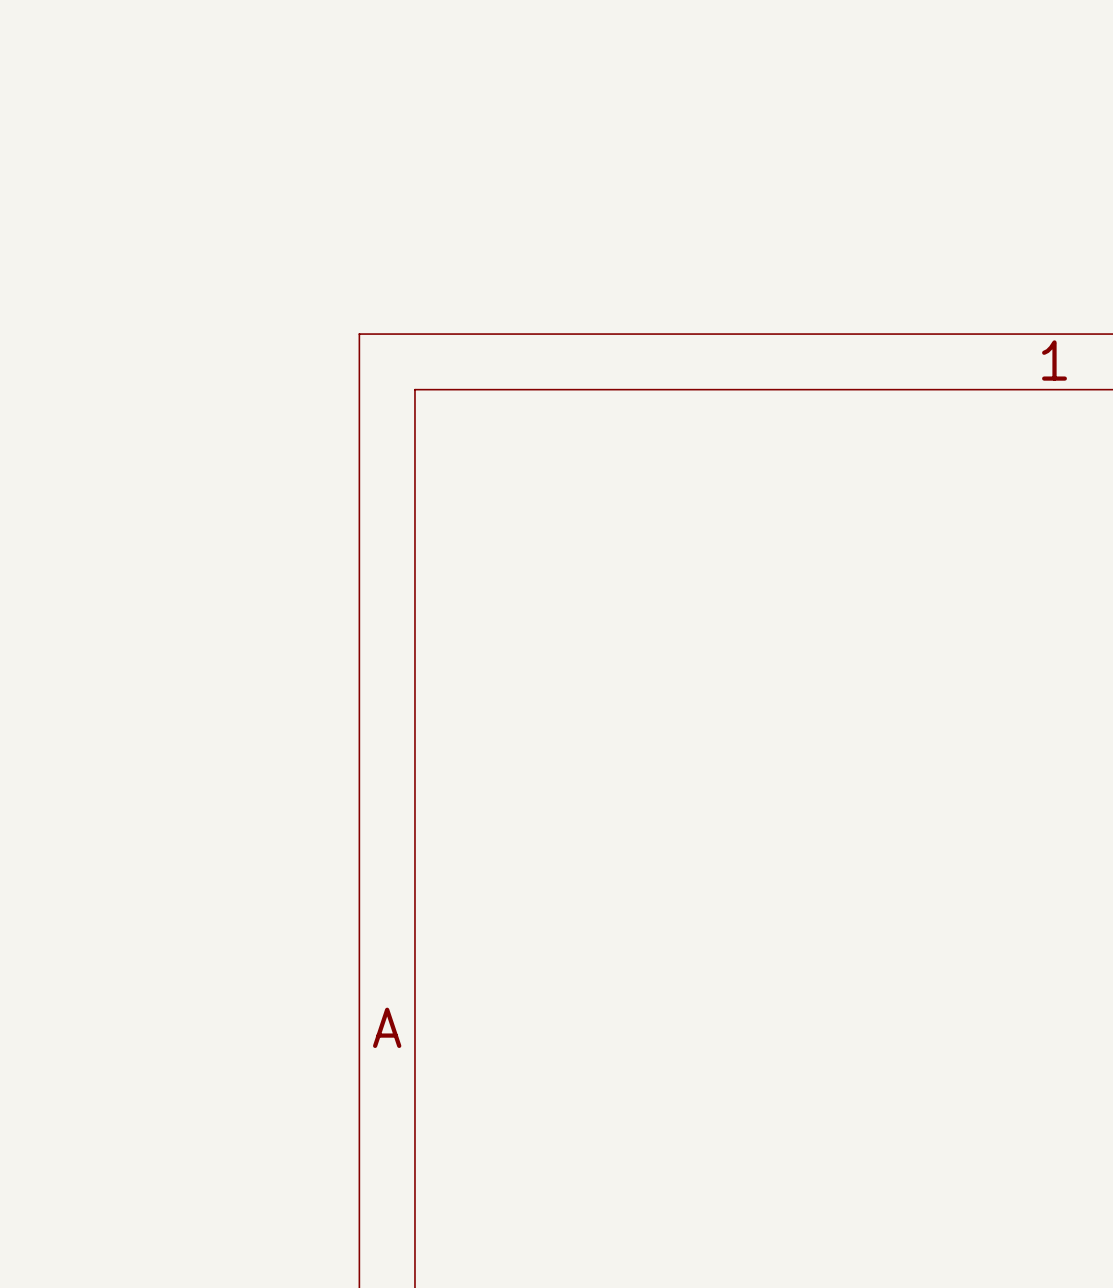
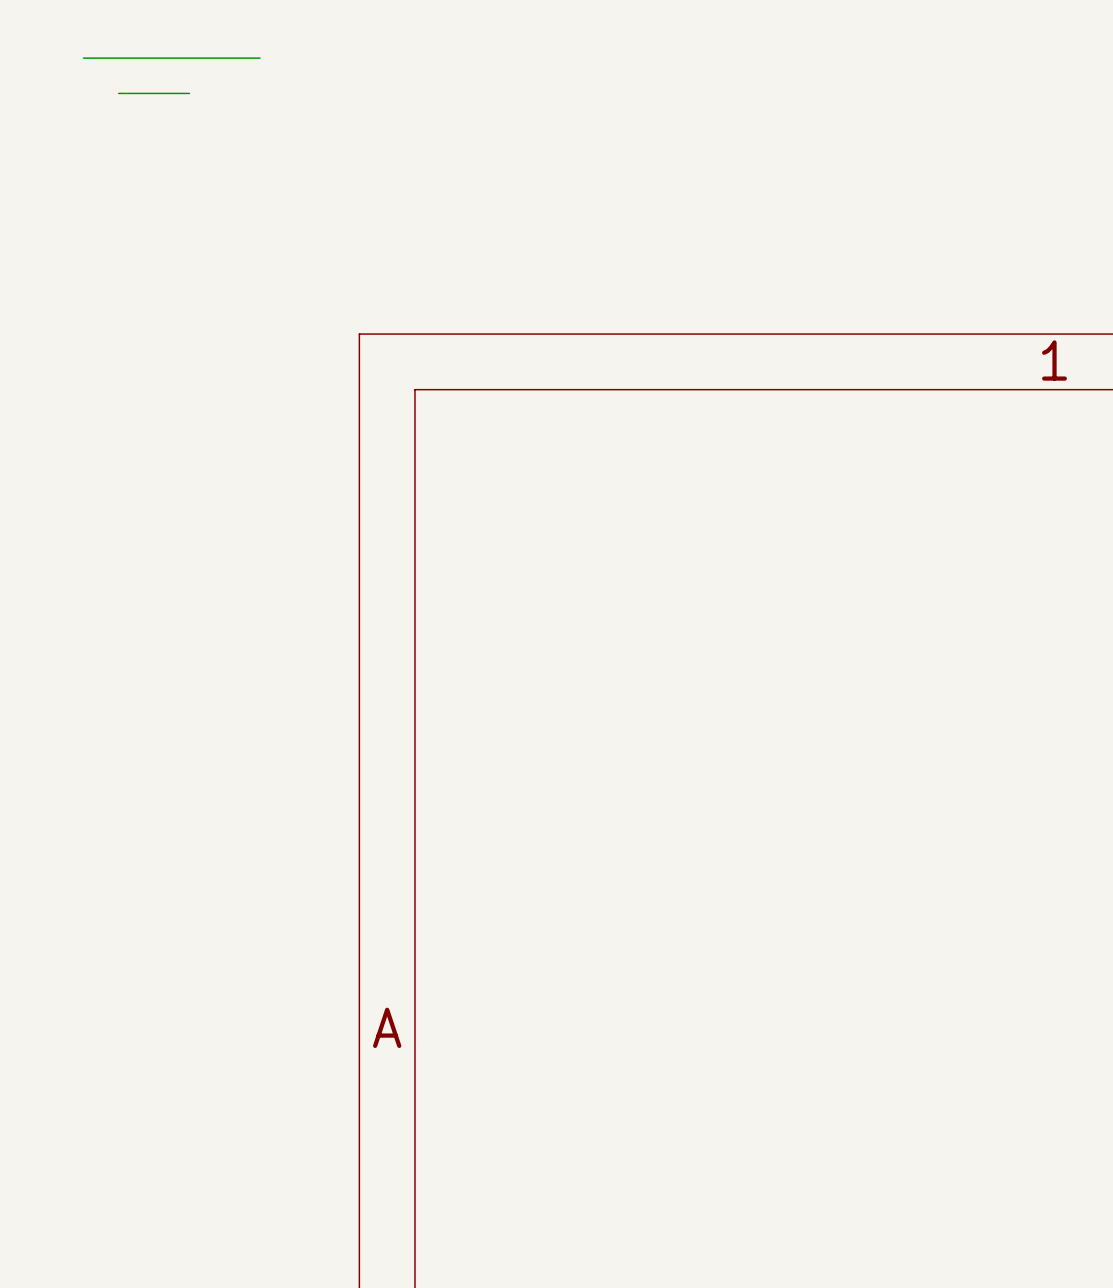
wire: none -> (83, 58) (260, 58)
wire: none -> (118, 93) (189, 93)

